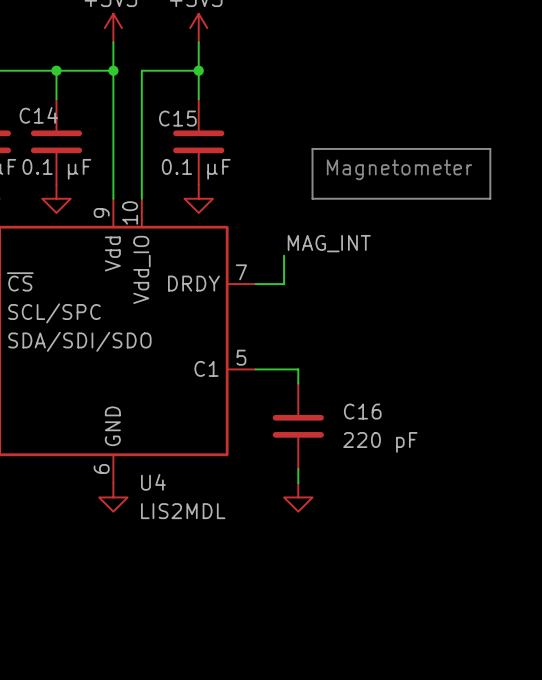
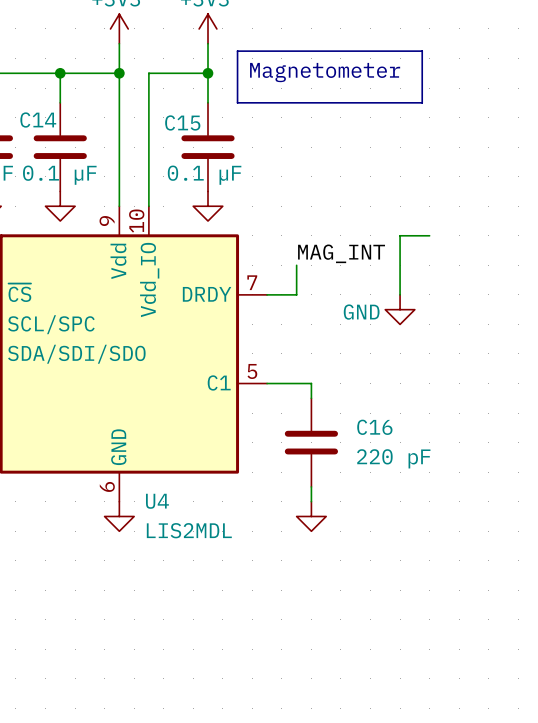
line: (312, 148) (490, 148) (490, 198) (312, 198) (312, 148) -> (237, 51) (422, 51) (422, 102) (237, 102) (237, 51)
text position: Magnetometer (399, 169) -> Magnetometer (325, 72)
wire: none -> (429, 235) (400, 235) (400, 294)
power symbol: none -> GND (400, 309)

